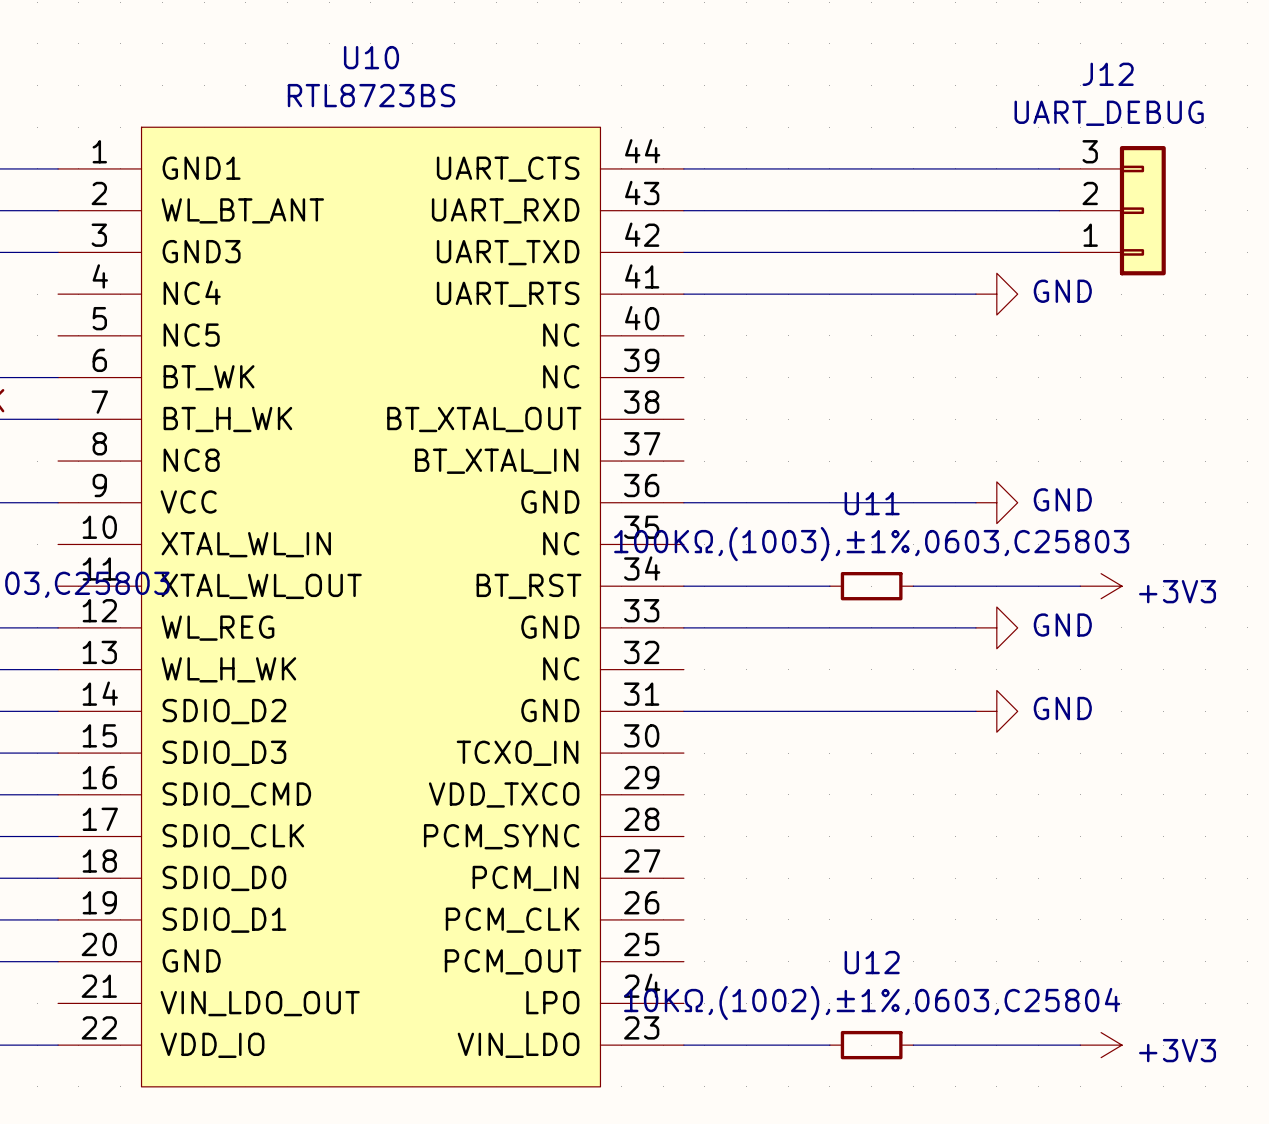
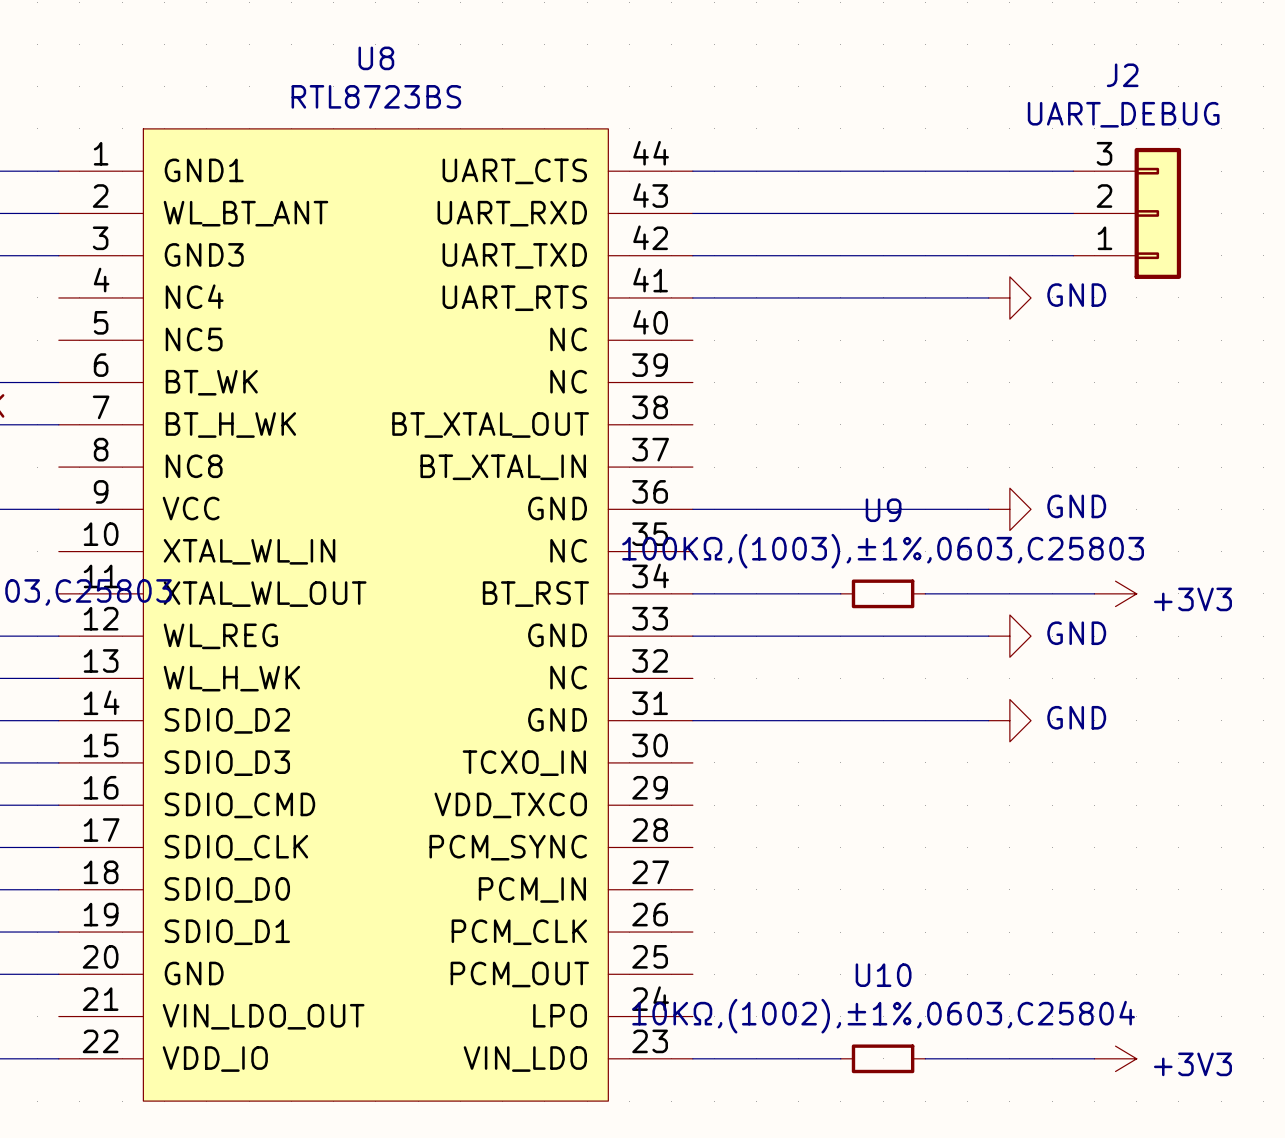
U10 name: U10 (371, 57) -> U8 (376, 58)
J12 name: J12 (1108, 74) -> J2 (1122, 75)
U11 name: U11 (872, 503) -> U9 (883, 510)
U12 name: U12 (872, 962) -> U10 (883, 975)

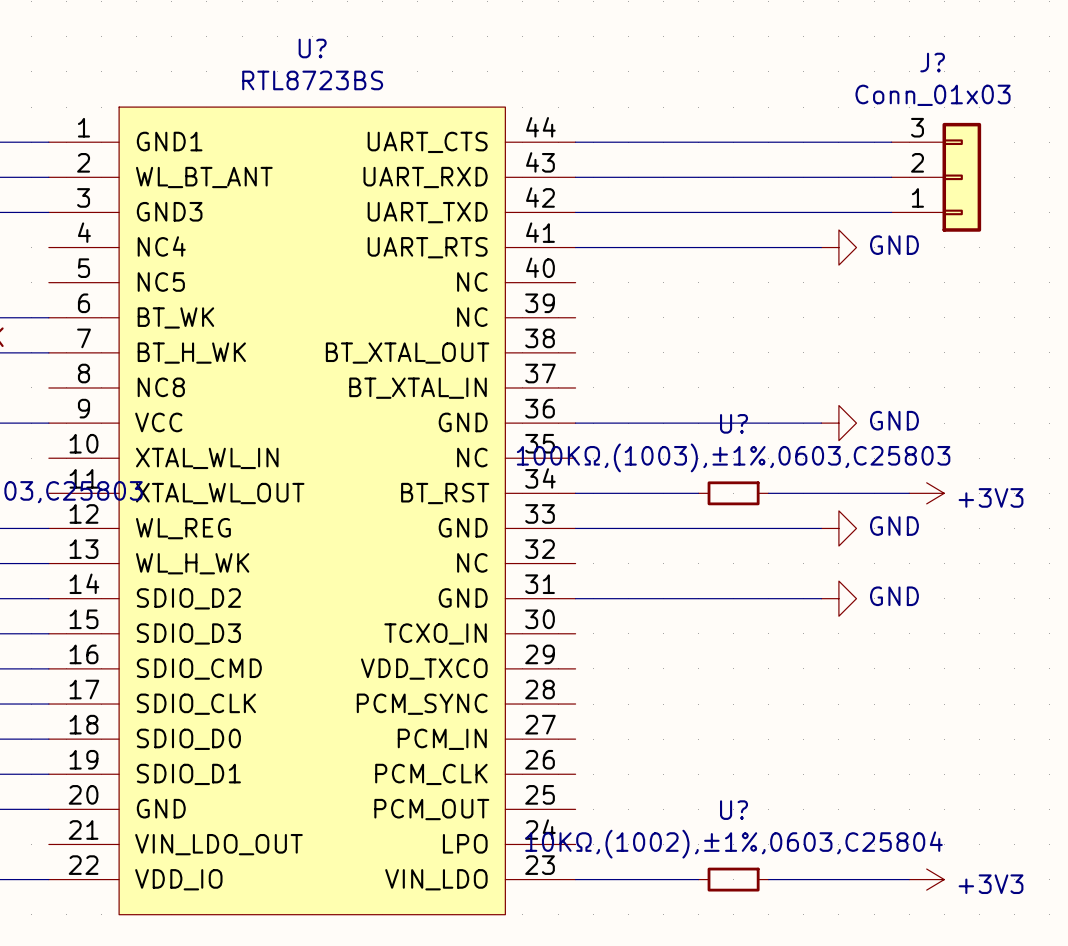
U8 name: U8 (376, 58) -> U? (312, 48)
J2 name: J2 (1122, 75) -> J? (932, 62)
J2 value: UART_DEBUG (1123, 114) -> Conn_01x03 (933, 95)
U9 name: U9 (883, 510) -> U? (734, 423)
U10 name: U10 (883, 975) -> U? (734, 810)

